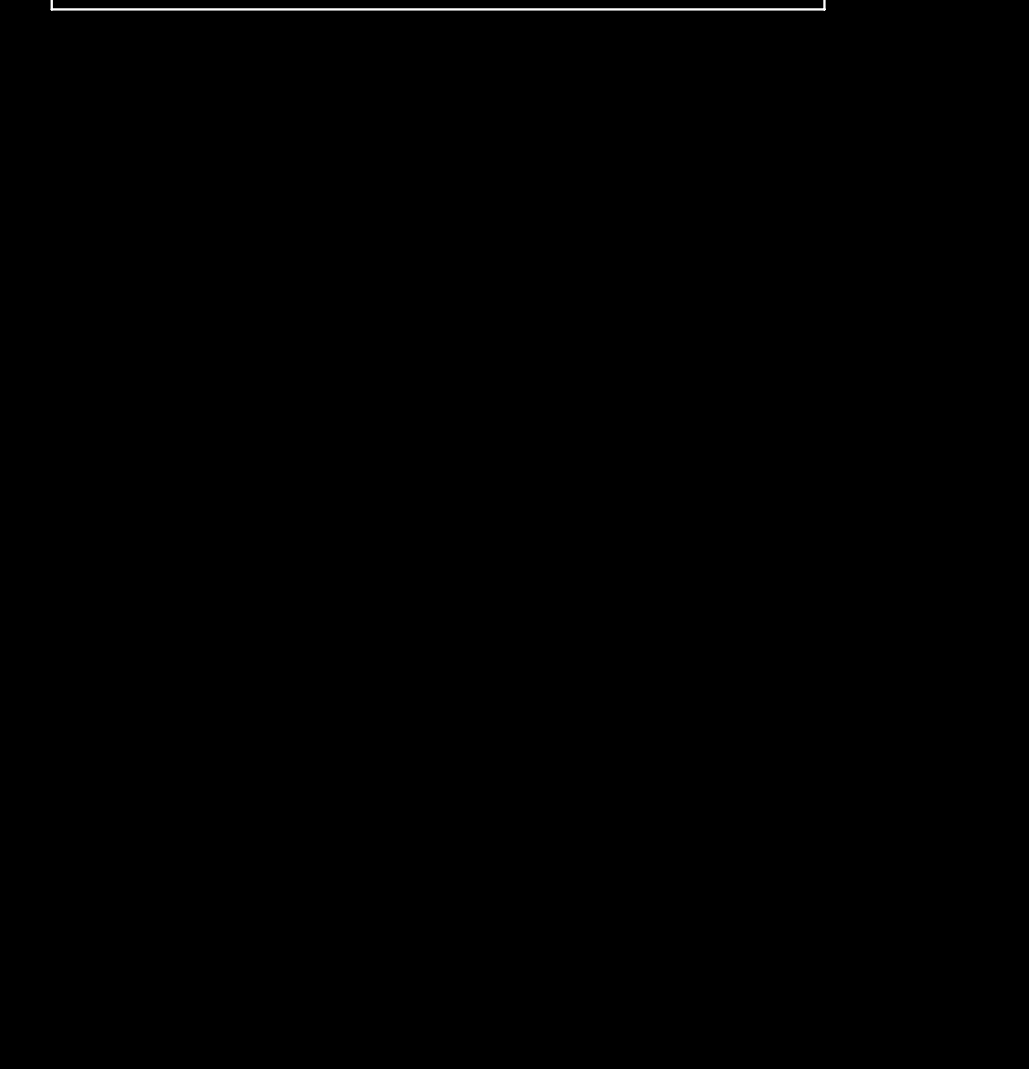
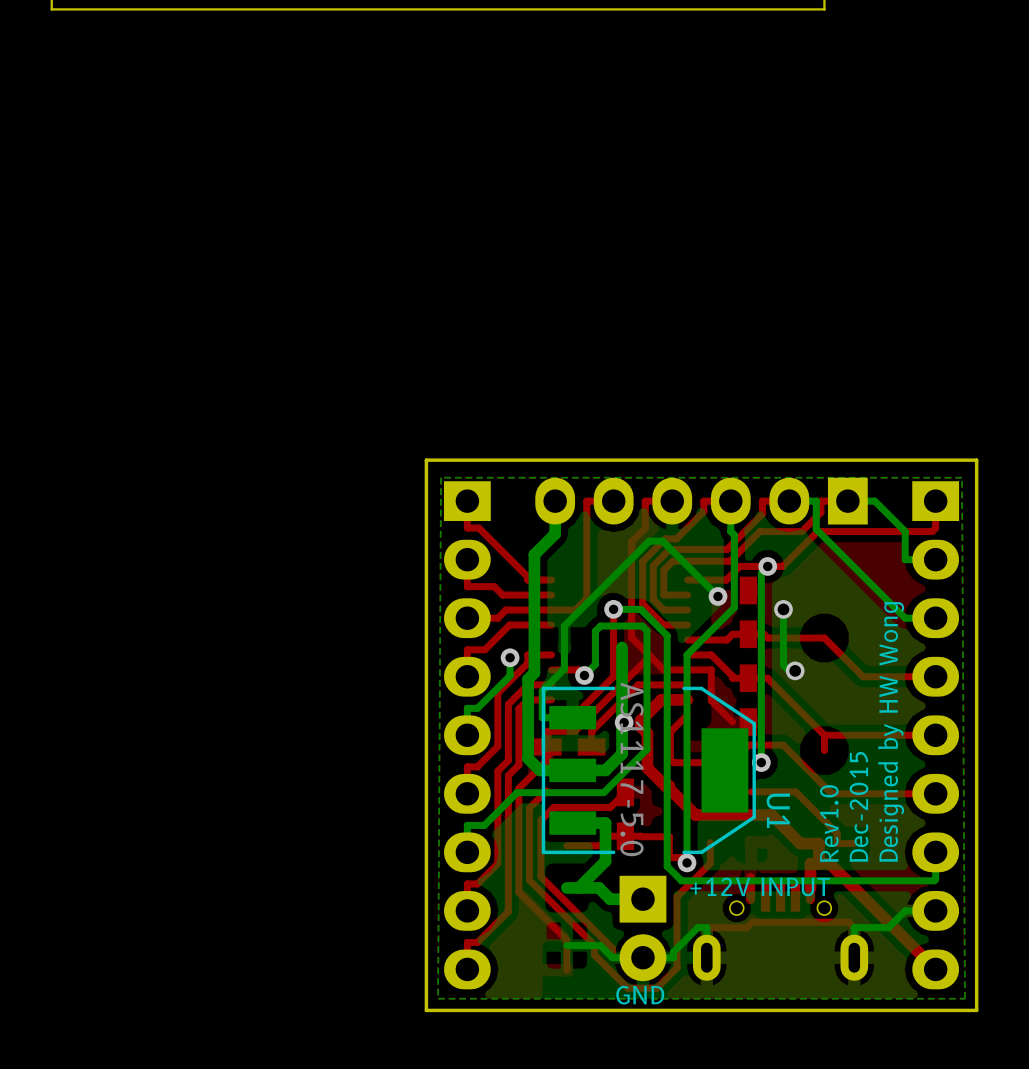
board edge: none -> (976, 460) (426, 460) (426, 1010) (976, 1010) (976, 460)
bottom zone outline: none -> (962, 477) (441, 477) (438, 998) (964, 998) (962, 477)
top track: none -> (467, 501) (467, 528) (478, 528) (527, 577) (527, 580) (551, 580)
bottom track: none -> (555, 501) (555, 533) (534, 554) (534, 672) (528, 679) (528, 758) (539, 770) (605, 770) (622, 753) (622, 647)
top track: none -> (613, 501) (586, 501) (586, 598) (575, 610) (506, 610) (497, 618) (467, 618)
top track: none -> (672, 501) (645, 501) (645, 528) (631, 541) (631, 637) (663, 669) (711, 669) (711, 700) (732, 722)
part: none -> (701, 501)
top track: none -> (730, 501) (703, 501) (703, 511) (676, 538) (665, 538) (642, 561) (642, 603) (663, 625) (687, 625)
bottom track: none -> (730, 501) (730, 531) (734, 535) (734, 607) (687, 654) (687, 862)
top track: none -> (789, 501) (762, 501) (762, 514) (726, 549) (669, 549) (653, 565) (653, 599) (663, 610) (687, 610)
bottom track: none -> (789, 501) (816, 501) (816, 529) (905, 618) (935, 618)
top track: none -> (847, 501) (820, 501) (820, 512) (801, 531) (759, 531) (730, 561) (672, 561) (663, 570) (663, 595) (687, 595)
bottom track: none -> (847, 501) (874, 501) (905, 531) (905, 559) (935, 559)
top track: none -> (935, 501) (935, 528) (932, 531) (817, 531) (782, 566) (739, 566) (726, 580) (687, 580)
top track: none -> (467, 559) (467, 586) (494, 586) (502, 595) (551, 595)
bottom track: none -> (767, 566) (761, 572) (761, 762)
via: none -> (767, 566)
bottom track: none -> (717, 596) (662, 541) (649, 541) (564, 626) (564, 668) (542, 691) (542, 717) (572, 717)
via: none -> (717, 596)
top track: none -> (613, 609) (613, 676) (575, 714) (551, 714)
bottom track: none -> (613, 609) (640, 609) (667, 635) (667, 866) (681, 880) (934, 880) (935, 852)
via: none -> (613, 609)
bottom track: none -> (783, 609) (783, 665) (789, 670) (795, 670)
via: none -> (783, 609)
part: none -> (748, 612)
top track: none -> (551, 625) (509, 625) (484, 649) (467, 649) (467, 676)
top track: none -> (687, 639) (726, 639) (732, 634) (764, 634) (767, 638) (824, 638) (863, 676) (935, 676)
top track: none -> (551, 654) (527, 654) (527, 663) (497, 693) (497, 746) (477, 766) (467, 766) (467, 793)
top track: none -> (687, 654) (711, 654) (732, 678) (767, 678) (824, 735)
top track: none -> (650, 656) (574, 731) (547, 731) (547, 762) (544, 762) (518, 788) (518, 892) (566, 940) (566, 970)
bottom track: none -> (510, 657) (510, 675) (477, 708) (467, 708) (467, 735)
via: none -> (510, 657)
top track: none -> (551, 669) (578, 669) (584, 675)
via: none -> (795, 670)
bottom track: none -> (584, 675) (595, 664) (595, 631) (600, 626) (642, 626) (646, 630) (646, 749) (603, 792) (517, 792) (484, 825) (467, 825) (467, 852)
via: none -> (584, 675)
top track: none -> (551, 684) (527, 684) (508, 704) (508, 760) (497, 771) (497, 863) (477, 883) (467, 883) (467, 910)
top track: none -> (687, 684) (638, 684) (591, 731) (591, 746)
top track: none -> (551, 699) (527, 699) (518, 708) (518, 765) (508, 775) (508, 911) (477, 942) (467, 942) (467, 969)
top track: none -> (687, 699) (661, 699) (640, 720) (640, 726) (647, 733) (647, 768) (665, 786) (669, 786)
part: none -> (748, 700)
top track: none -> (687, 714) (670, 732) (670, 759) (673, 762) (731, 762) (748, 745) (783, 745) (831, 793) (935, 793)
via: none -> (624, 722)
text: none -> Designed by HW Wong (891, 732)
part: none -> (467, 735)
top track: none -> (824, 735) (824, 750)
top track: none -> (935, 735) (824, 735)
part: none -> (935, 735)
part: none -> (569, 746)
via: none -> (761, 762)
U1: none -> AS1117-5.0 (648, 770)
top track: none -> (668, 786) (695, 815) (771, 815) (800, 843) (818, 843) (818, 863)
top track: none -> (546, 790) (529, 808) (529, 880) (594, 945) (594, 955) (627, 988) (656, 988) (677, 967) (677, 896) (710, 863) (710, 842)
top track: none -> (751, 791) (795, 791) (837, 833) (837, 843) (853, 843)
top track: none -> (625, 792) (610, 807) (553, 807) (540, 820) (540, 876) (612, 948) (612, 957) (642, 957)
text: none -> Dec-2015 (858, 806)
part: none -> (625, 814)
bottom track: none -> (572, 823) (605, 823) (605, 861) (578, 887)
text: none -> Rev1.0 (829, 823)
top track: none -> (566, 845) (600, 845) (609, 836) (669, 836) (669, 857) (681, 857) (687, 862)
via: none -> (687, 862)
text: none -> +12V INPUT (760, 886)
bottom track: none -> (566, 887) (598, 887) (610, 899) (642, 899)
top track: none -> (810, 888) (810, 863) (829, 863) (935, 969)
bottom track: none -> (935, 910) (905, 910) (888, 927) (854, 927) (854, 957)
part: none -> (780, 926)
part: none -> (642, 928)
bottom track: none -> (566, 945) (600, 945) (612, 957) (673, 957) (673, 952) (697, 927) (706, 927) (706, 957)
top track: none -> (854, 957) (854, 927) (848, 922) (752, 922) (746, 927) (706, 927) (706, 957)
text: none -> GND (640, 995)

